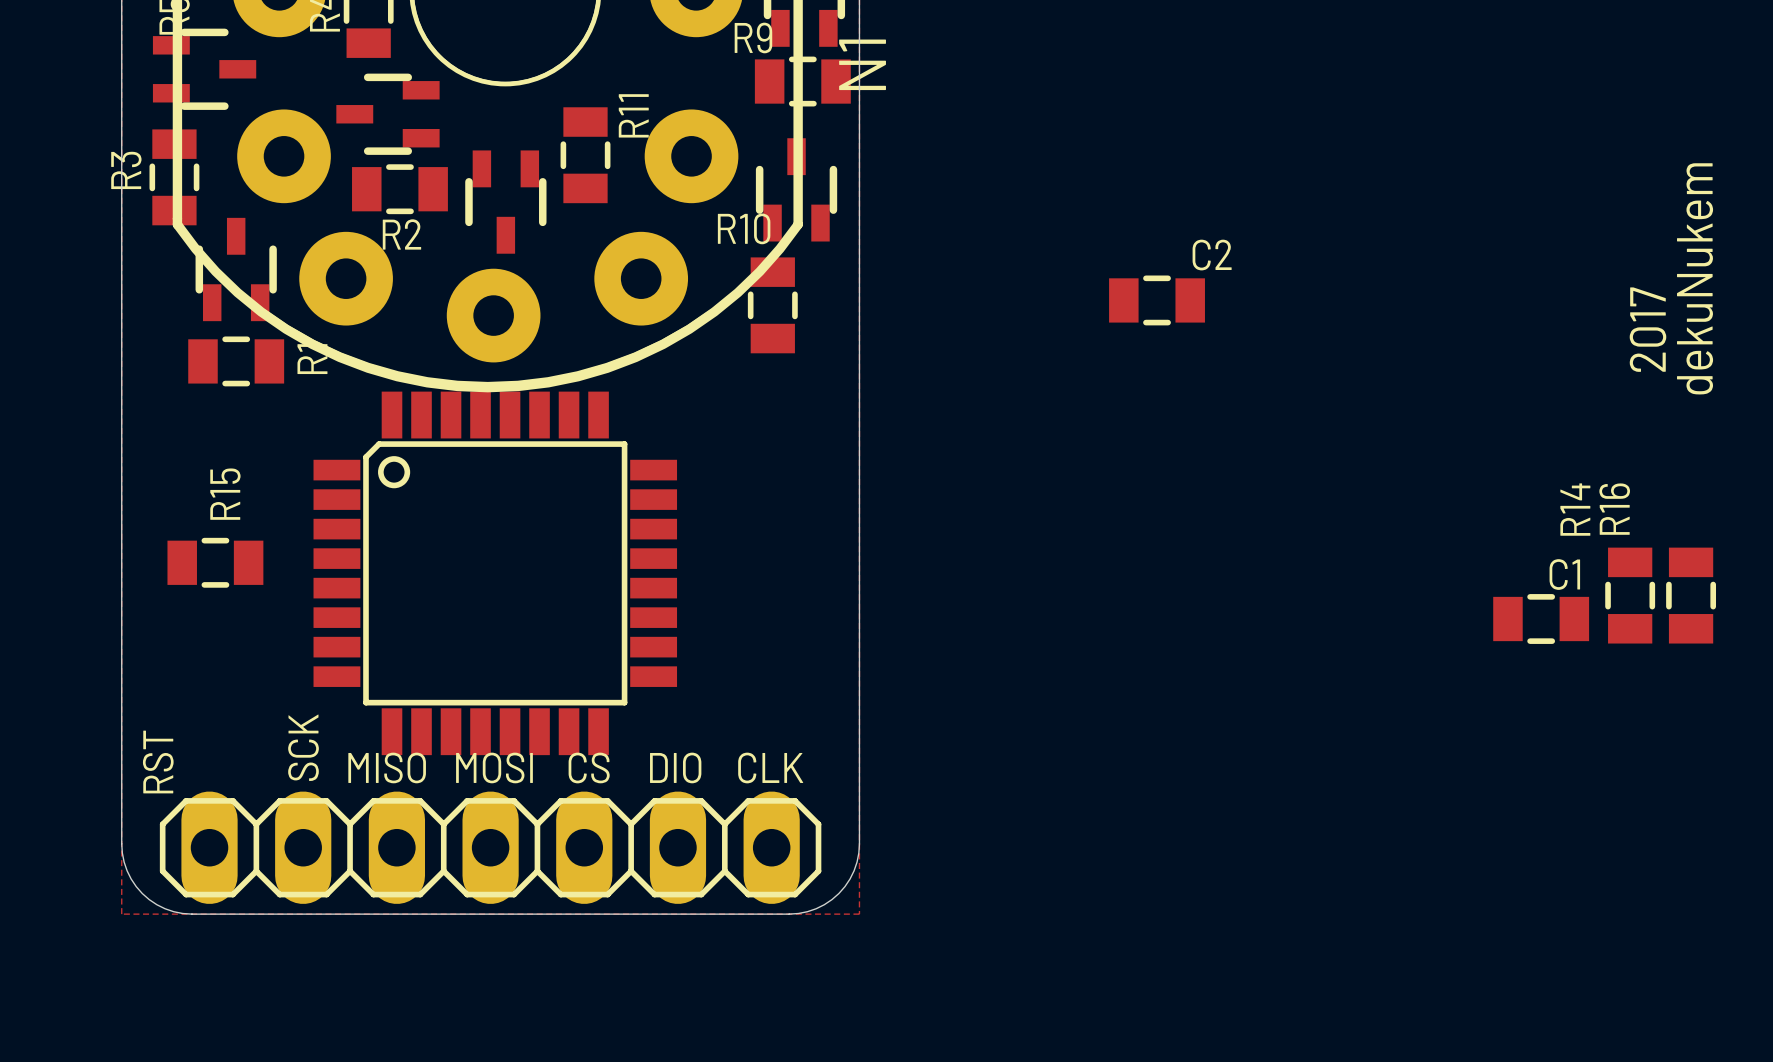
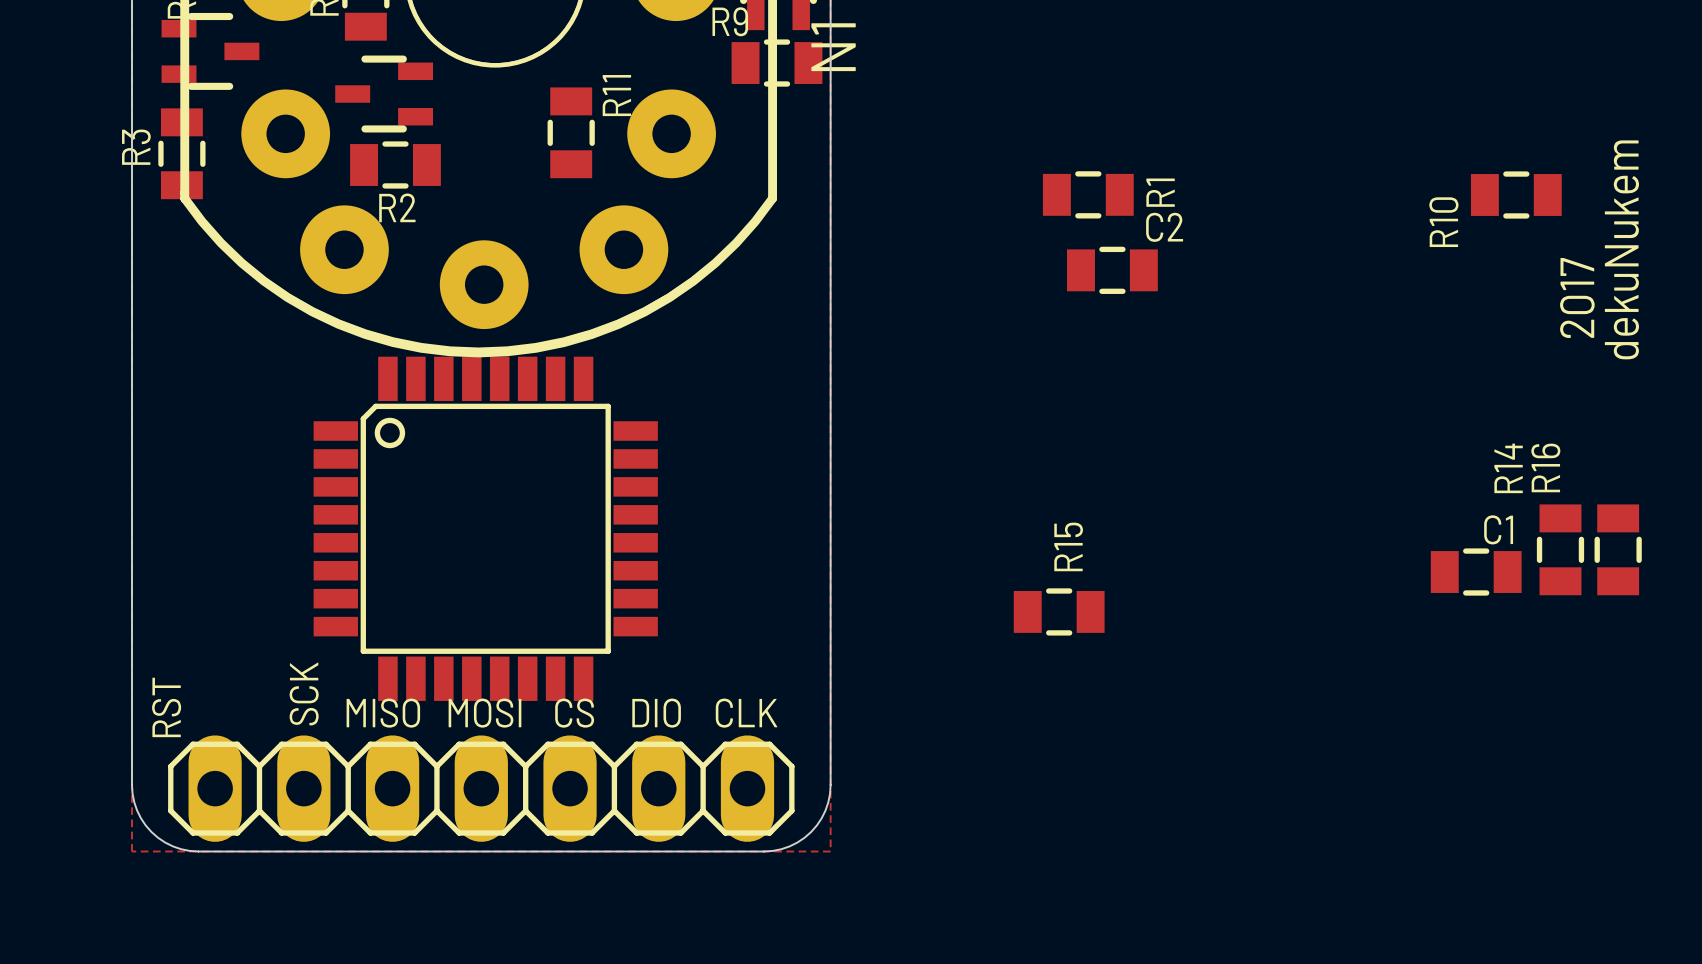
part: (796, 189) -> none
part: (505, 202) -> none
R10 name position: R10 (744, 228) -> R10 (1443, 222)
part: (236, 269) -> none
R10 rotation: 0° (772, 305) -> 90° clockwise (1516, 195)
R10 position: (772, 305) -> (1516, 195)
R1 position: (236, 361) -> (1088, 194)
R15 position: (215, 562) -> (1059, 611)

